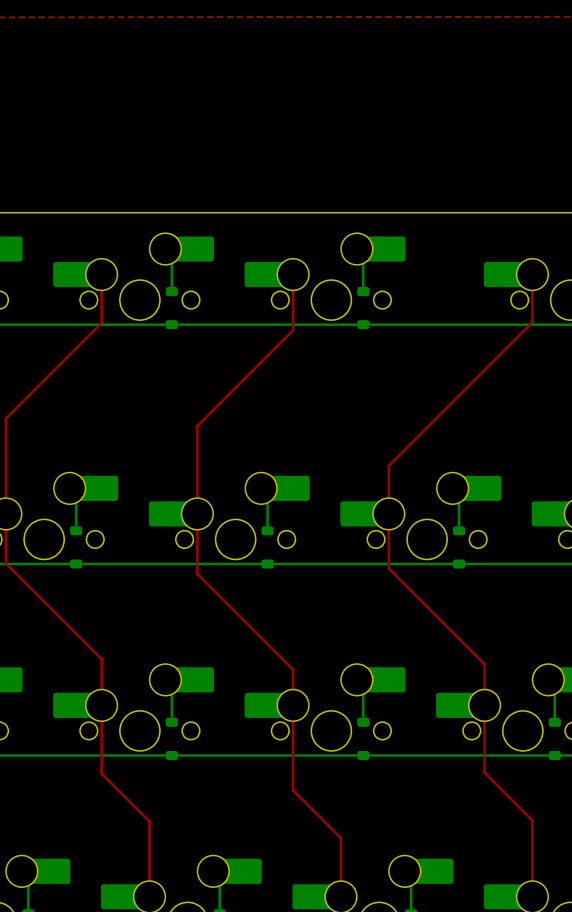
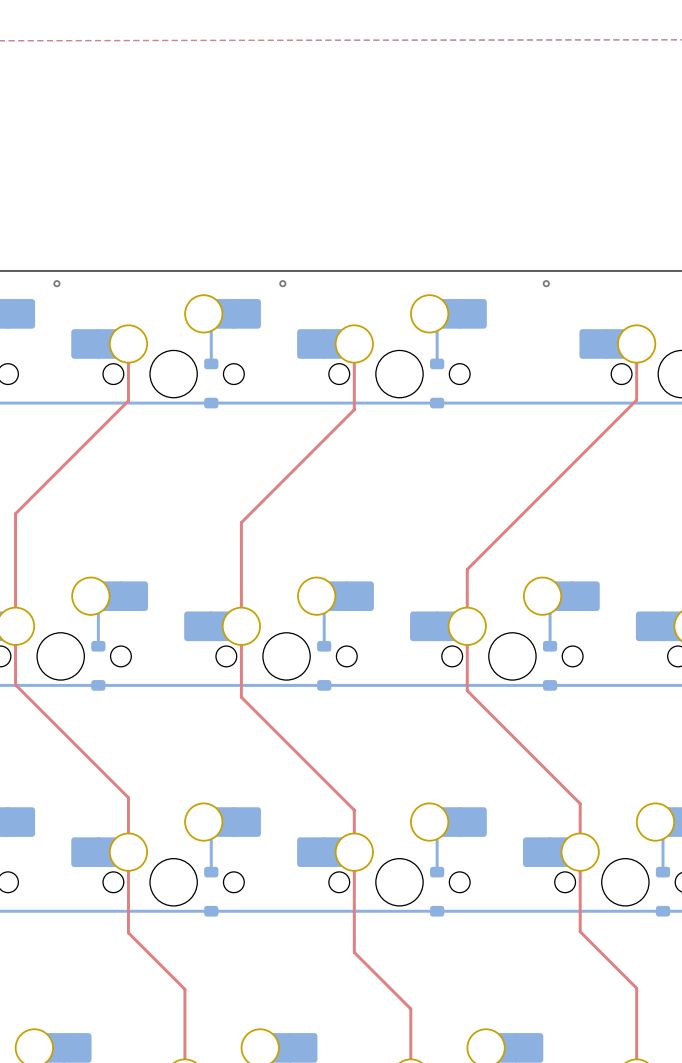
via: none -> (56, 283)
via: none -> (282, 283)
via: none -> (546, 283)

